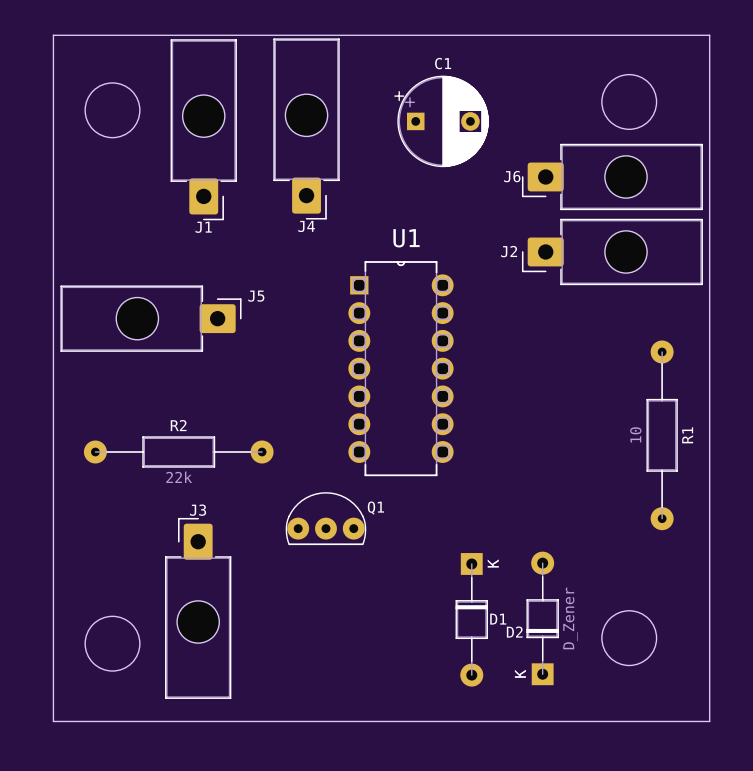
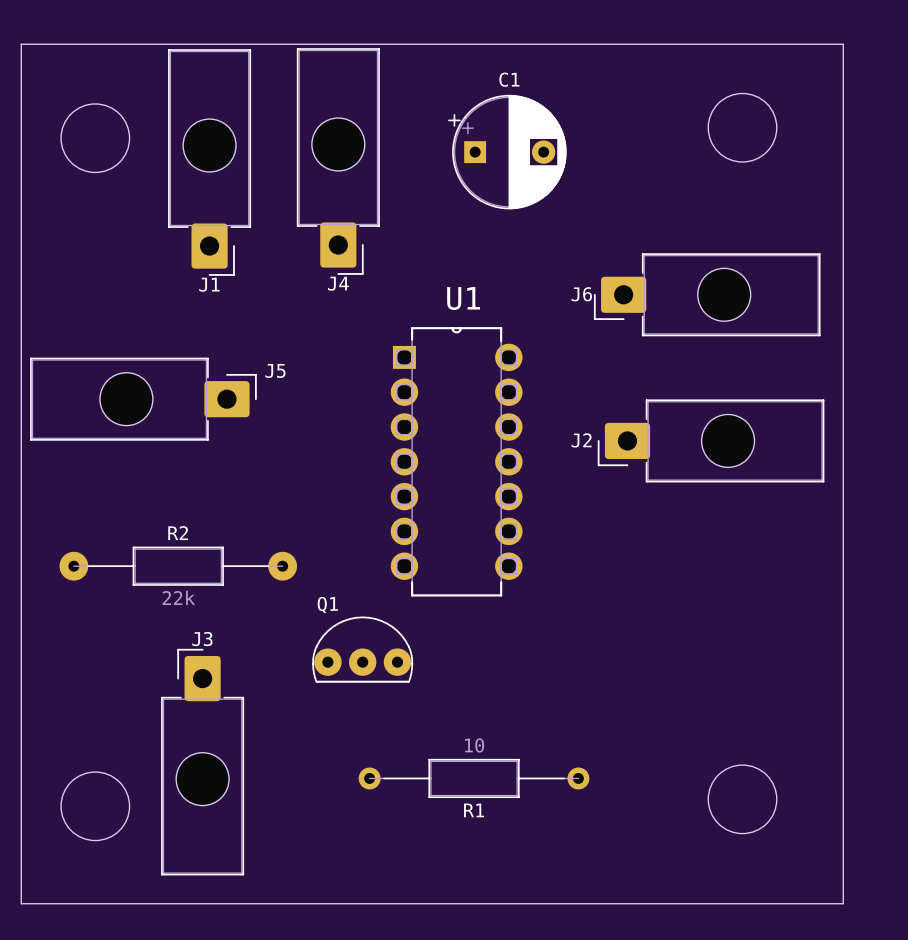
J6 position: (612, 176) -> (707, 294)
J2 position: (612, 251) -> (711, 440)
R1 footprint: [646, 340, 678, 531] -> [358, 758, 590, 799]
R1 value position: 10 (635, 434) -> 10 (474, 745)
R1 name position: R1 (687, 435) -> R1 (474, 810)
Q1 name position: Q1 (375, 508) -> Q1 (327, 605)
D2: D_Zener (542, 618) -> none
D1: (471, 619) -> none

